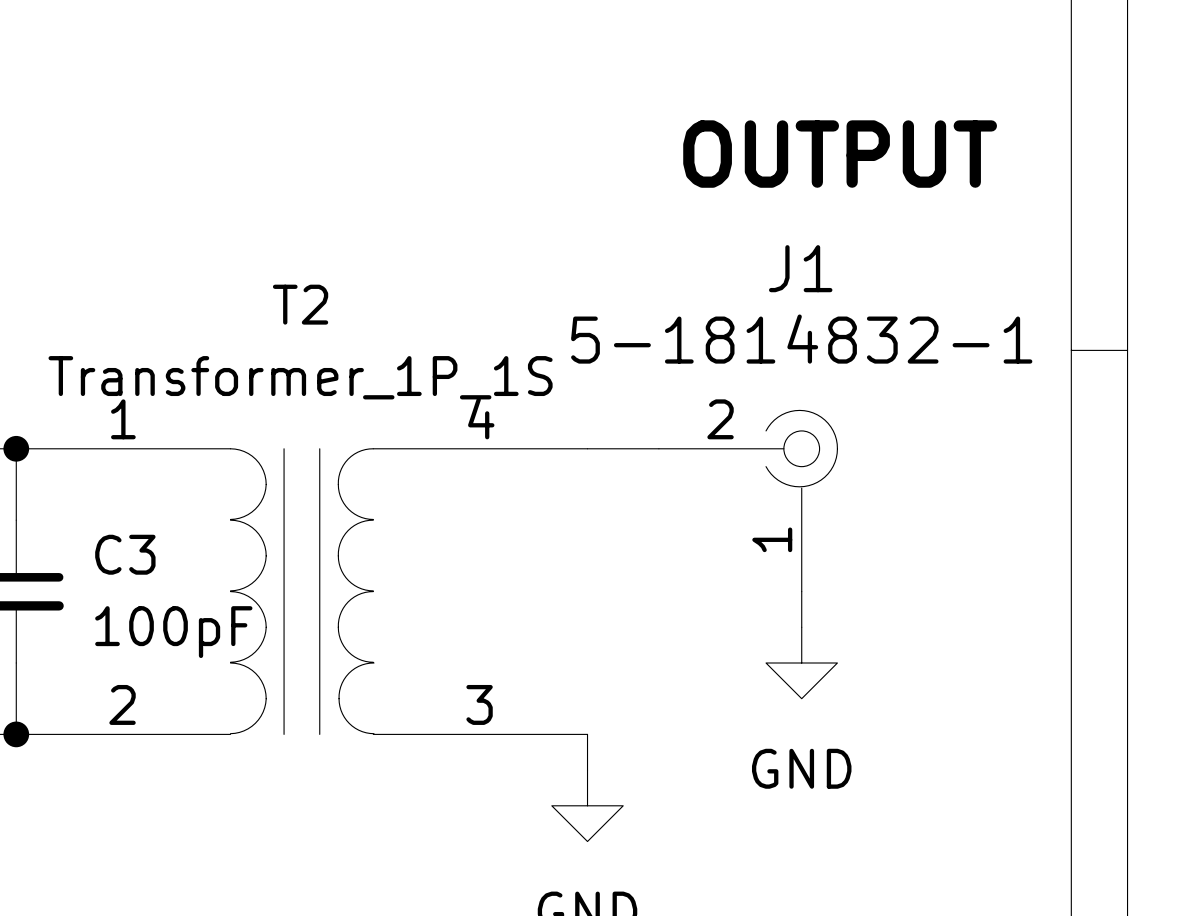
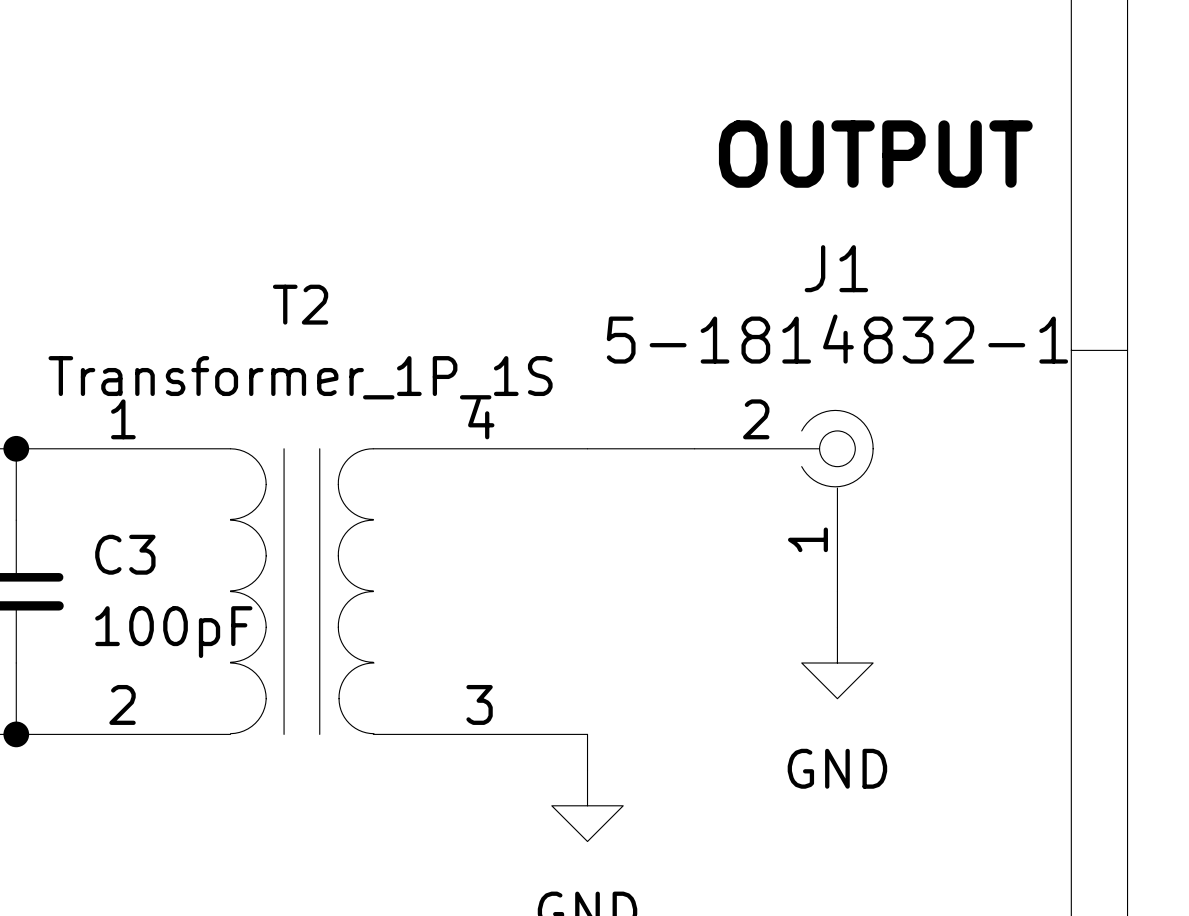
text position: OUTPUT (840, 154) -> OUTPUT (875, 154)
J1 position: (748, 501) -> (783, 501)
wire: (801, 591) (801, 627) -> (837, 591) (837, 627)
power symbol position: GND (801, 663) -> GND (837, 663)

